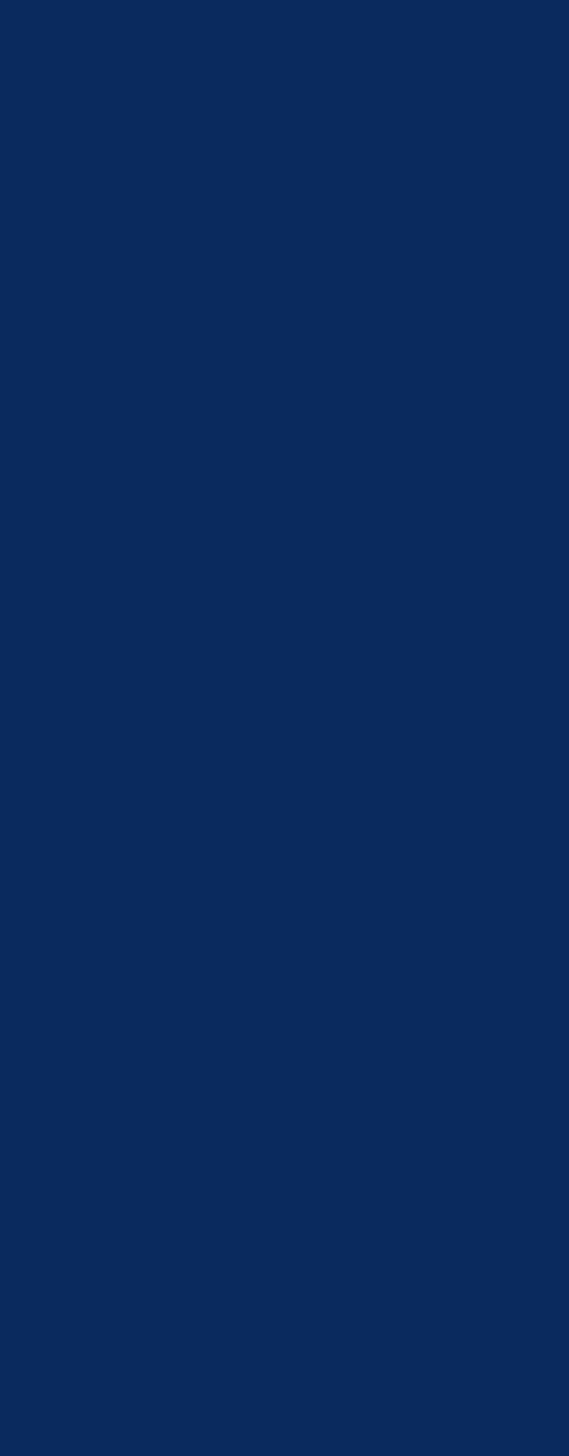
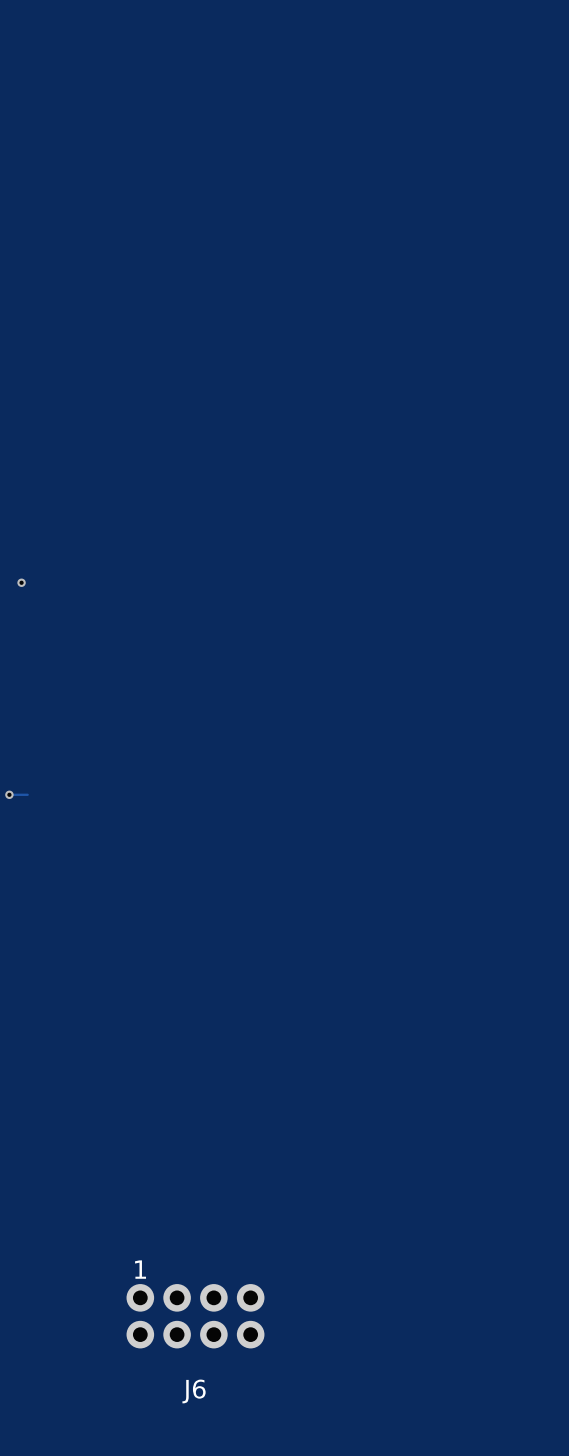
via: none -> (21, 582)
track: none -> (9, 794) (27, 794)
via: none -> (9, 794)
J6: none -> (195, 1316)

